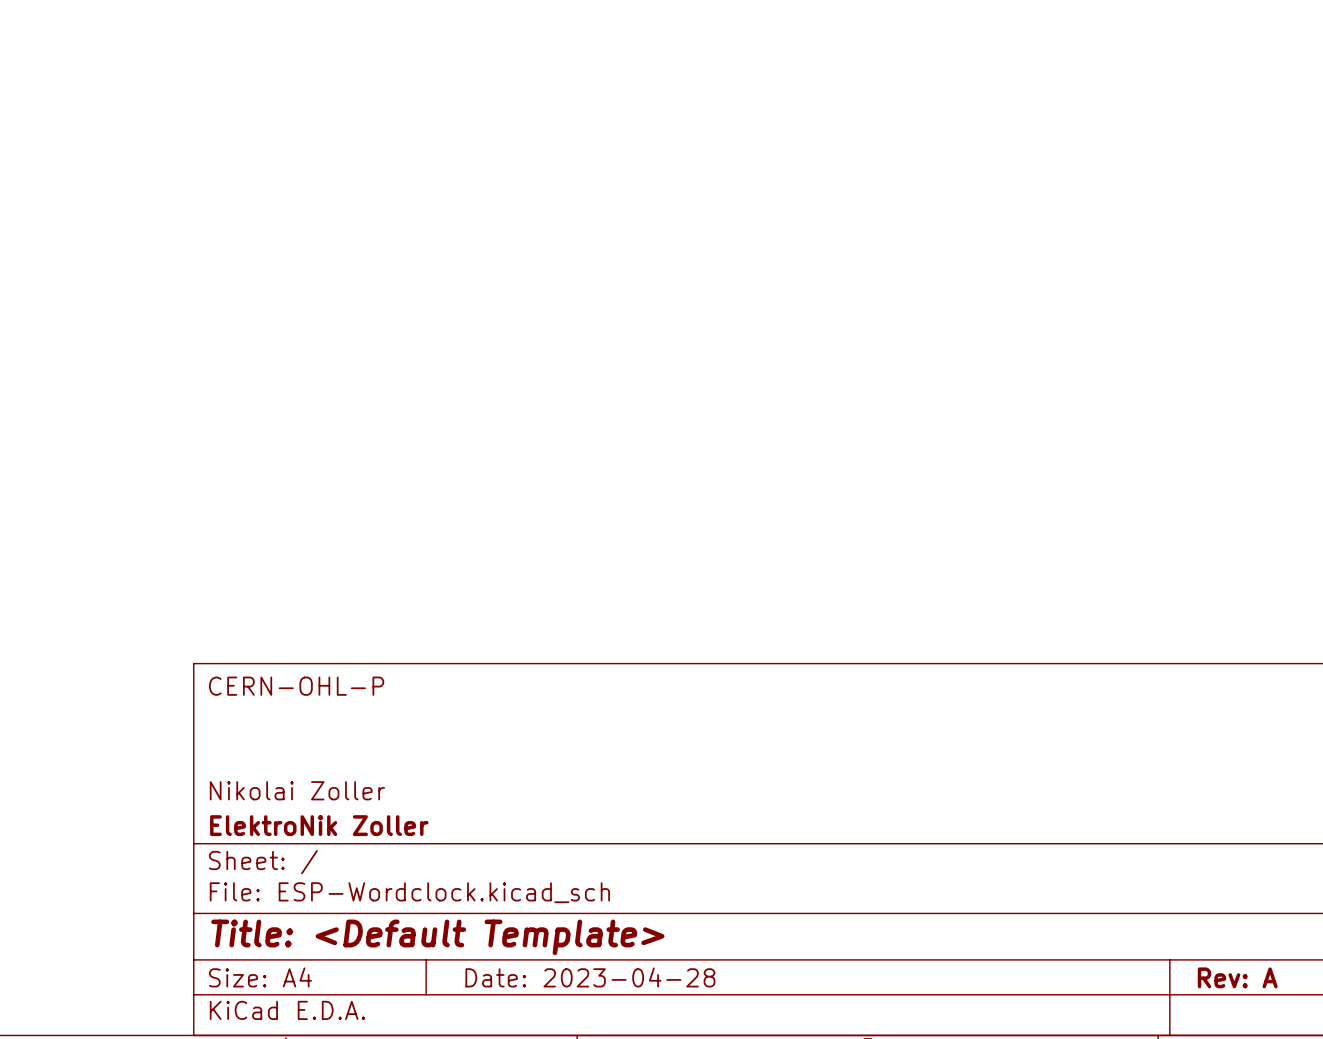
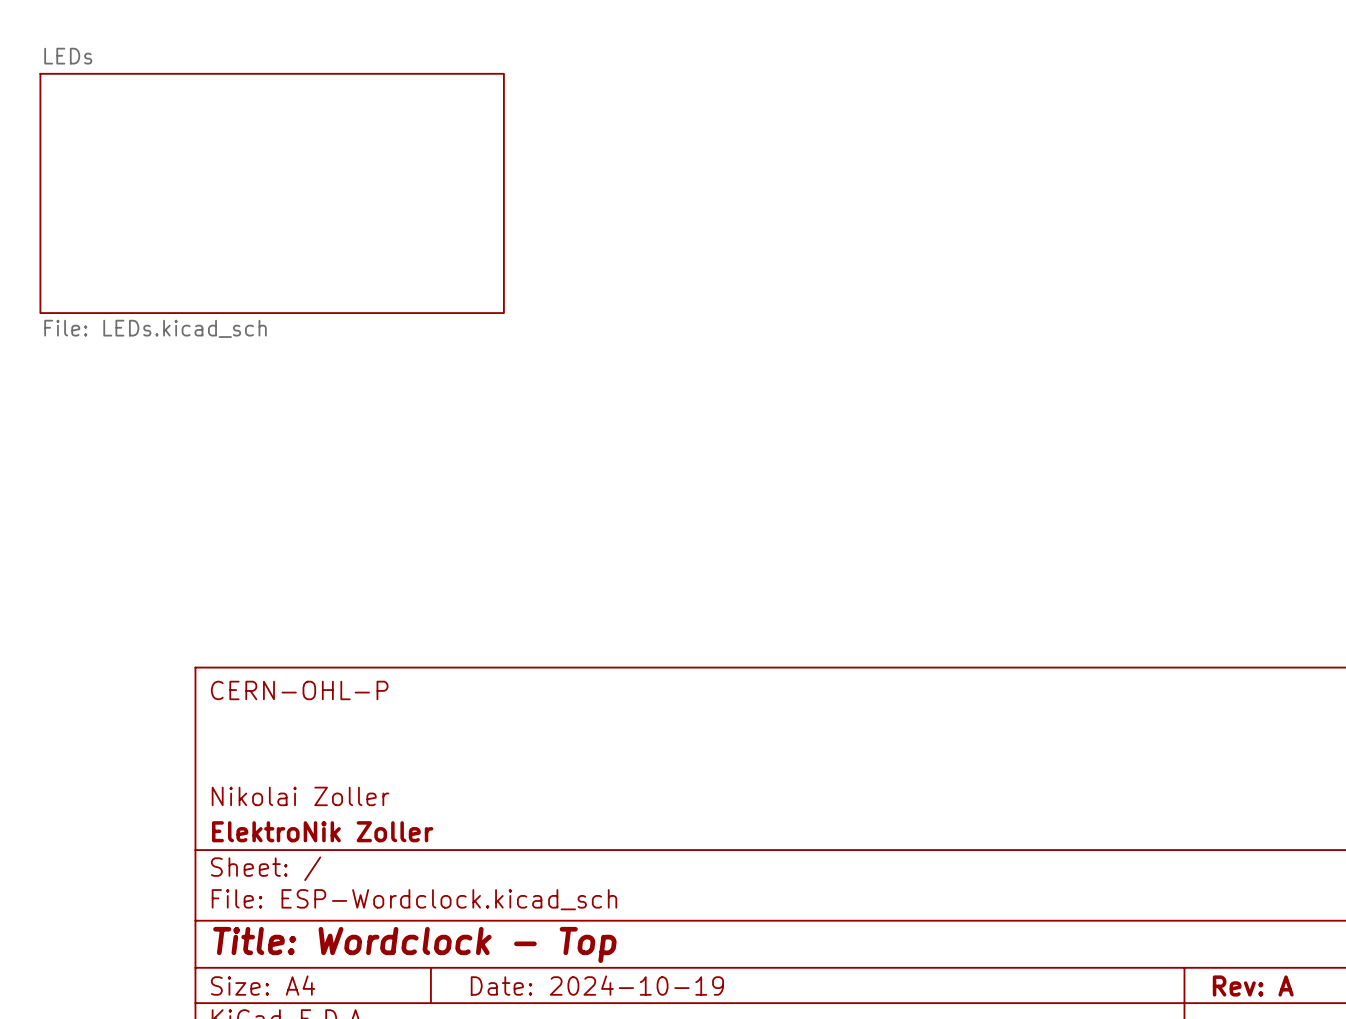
sheet LEDs: none -> File: LEDs.kicad_sch (272, 193)
title block: Title: <Default Template> (437, 937) -> Title: Wordclock - Top (414, 944)
title block: Date: 2023-04-28 (590, 977) -> Date: 2024-10-19 (597, 985)

